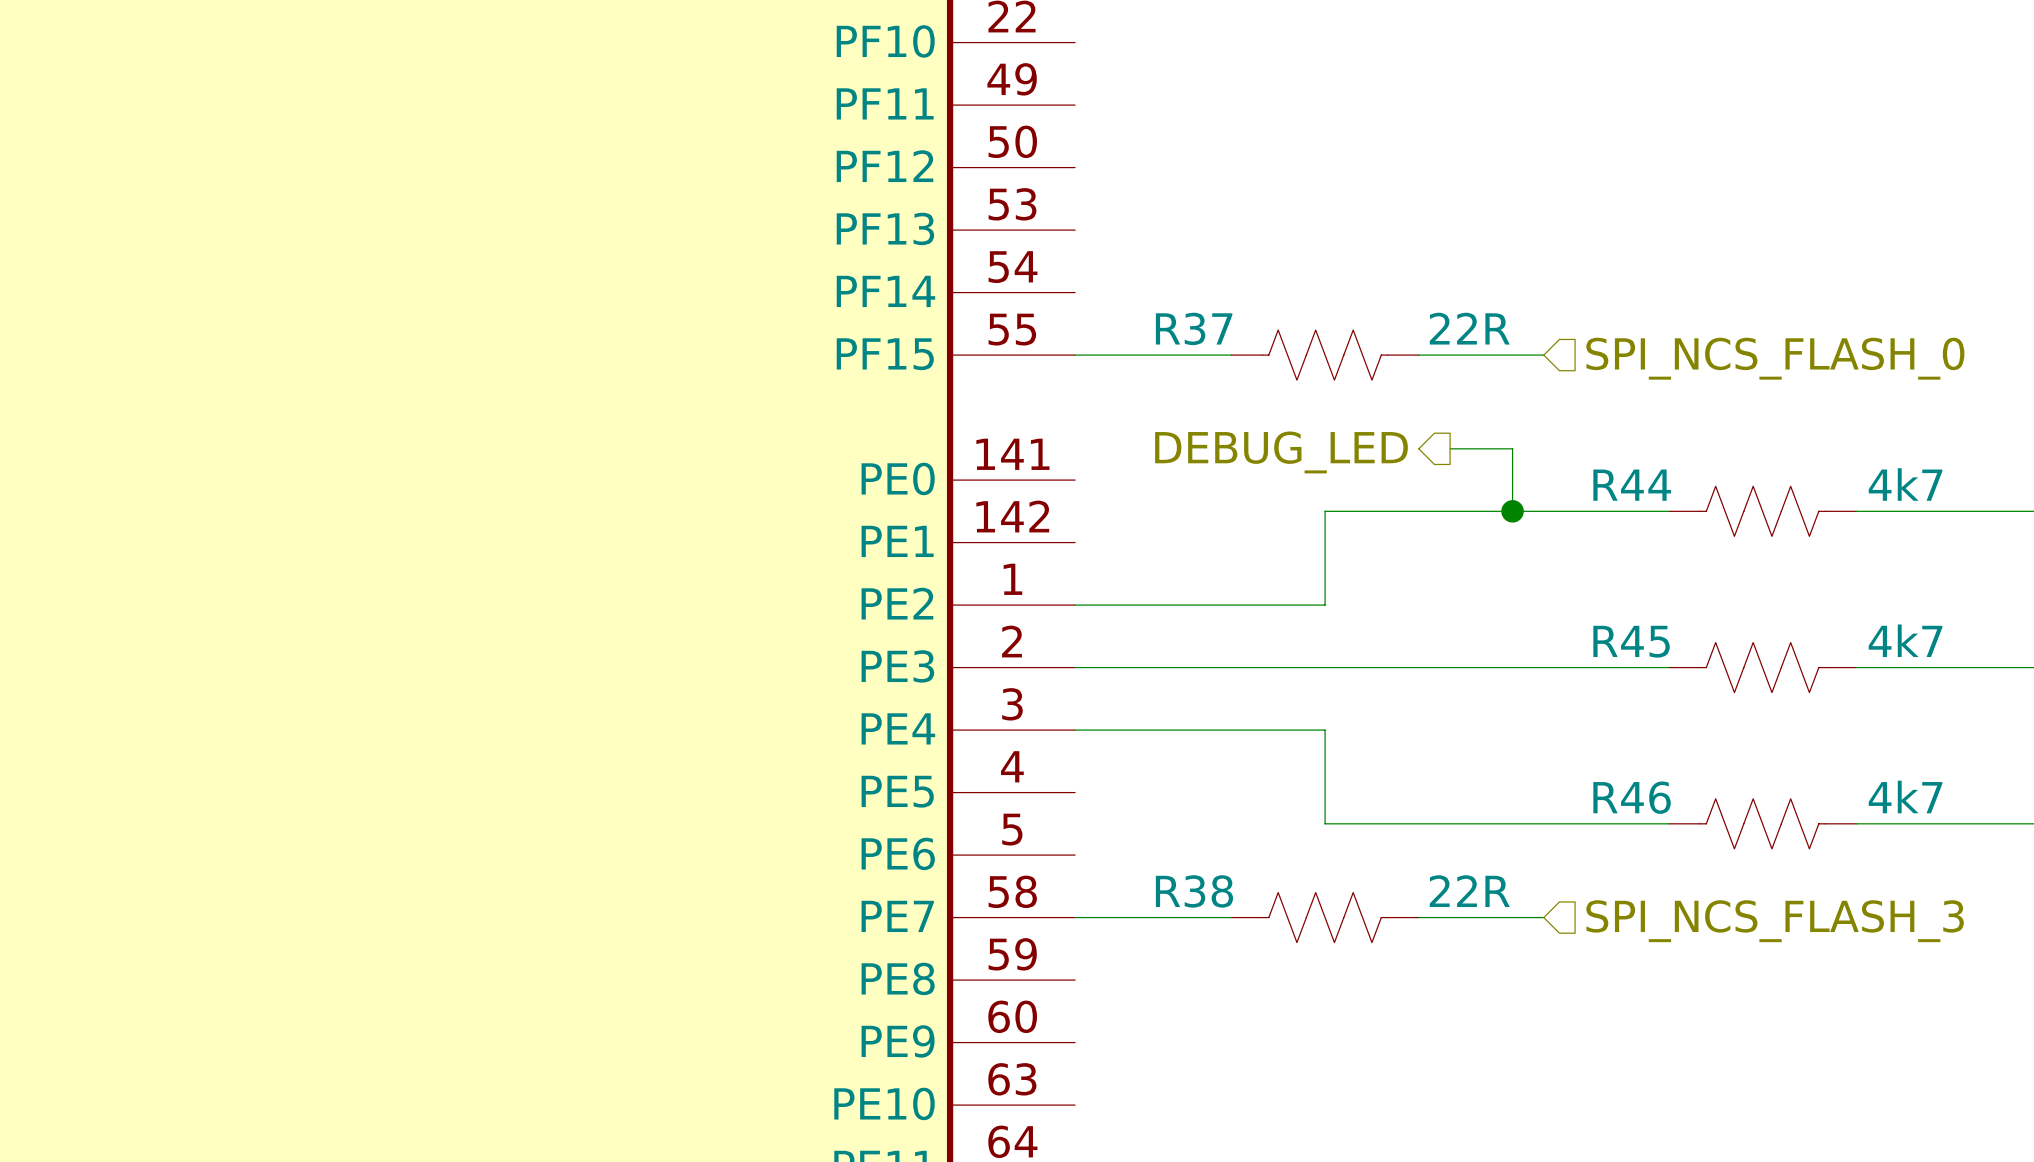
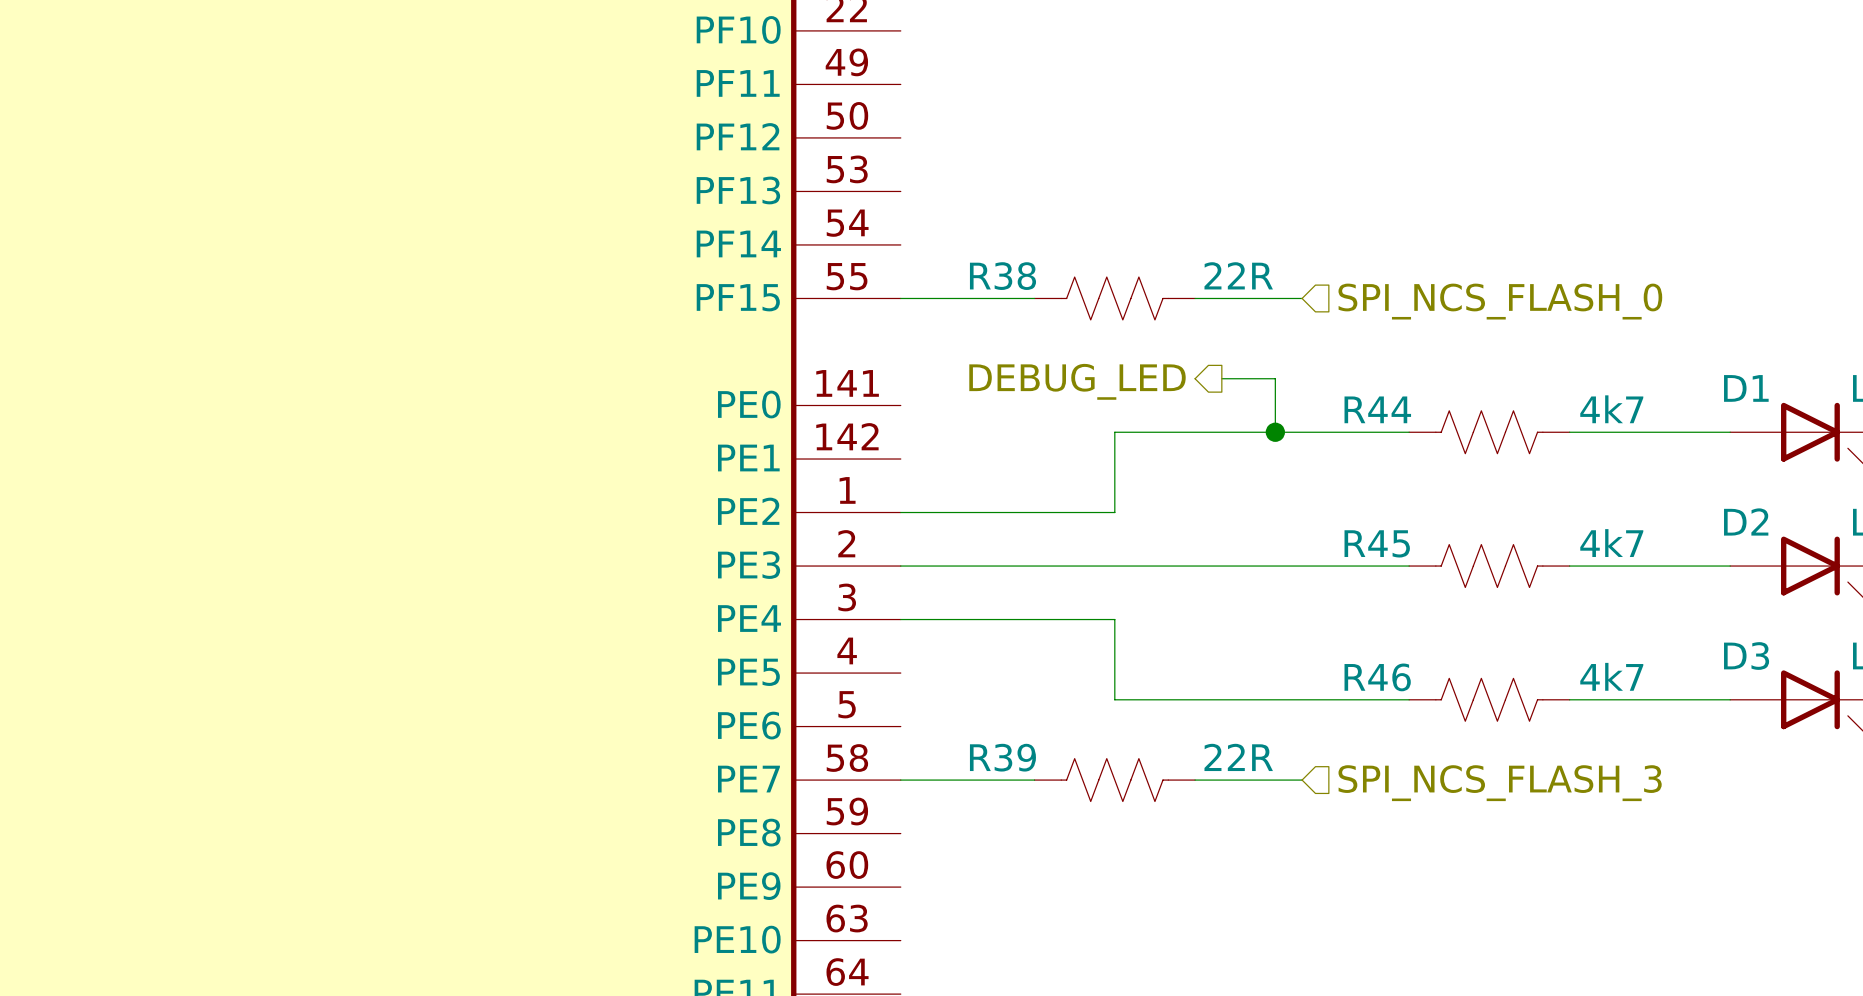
R37 name: R37 (1194, 328) -> R38 (1002, 276)
R38 name: R38 (1194, 891) -> R39 (1002, 757)

